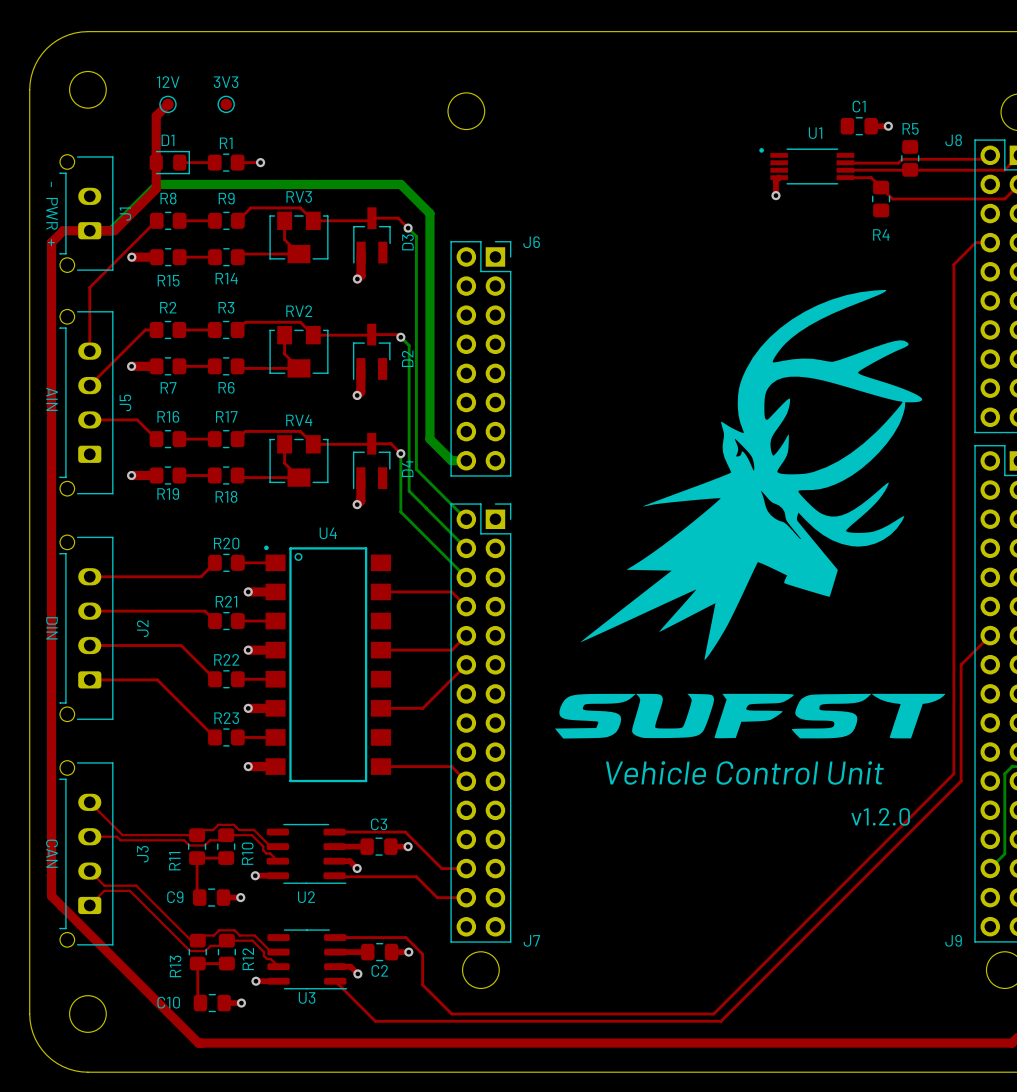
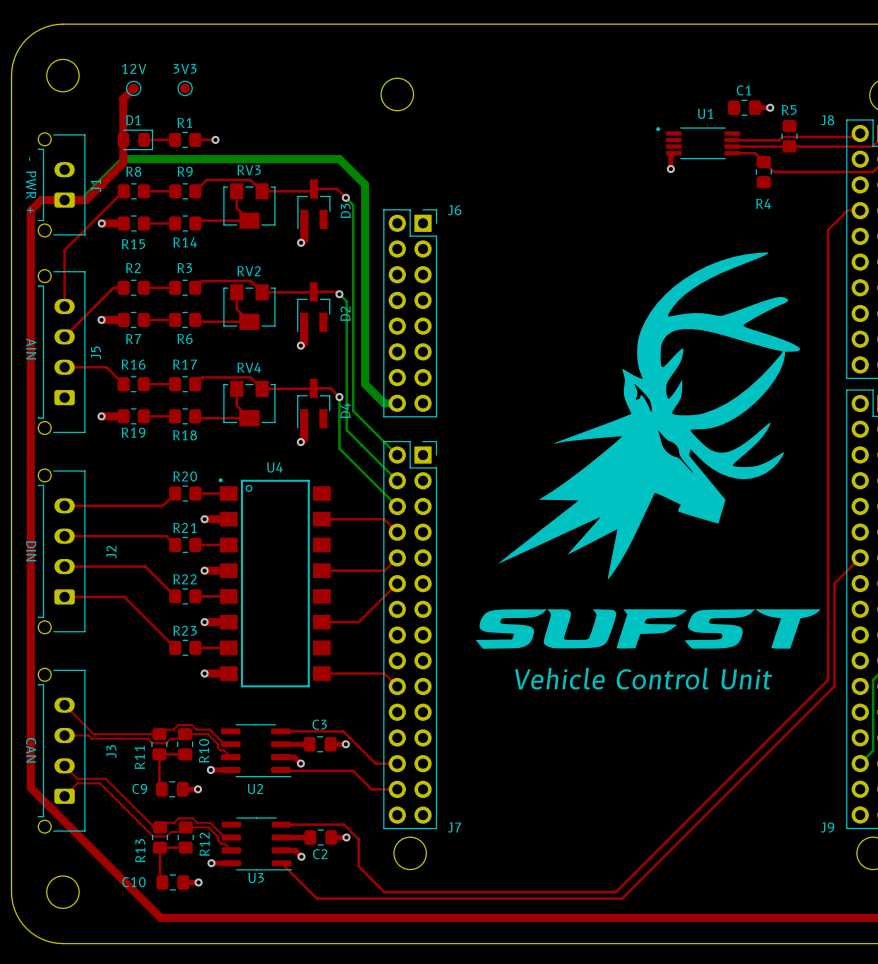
text: v1.2.0 (880, 816) -> none

